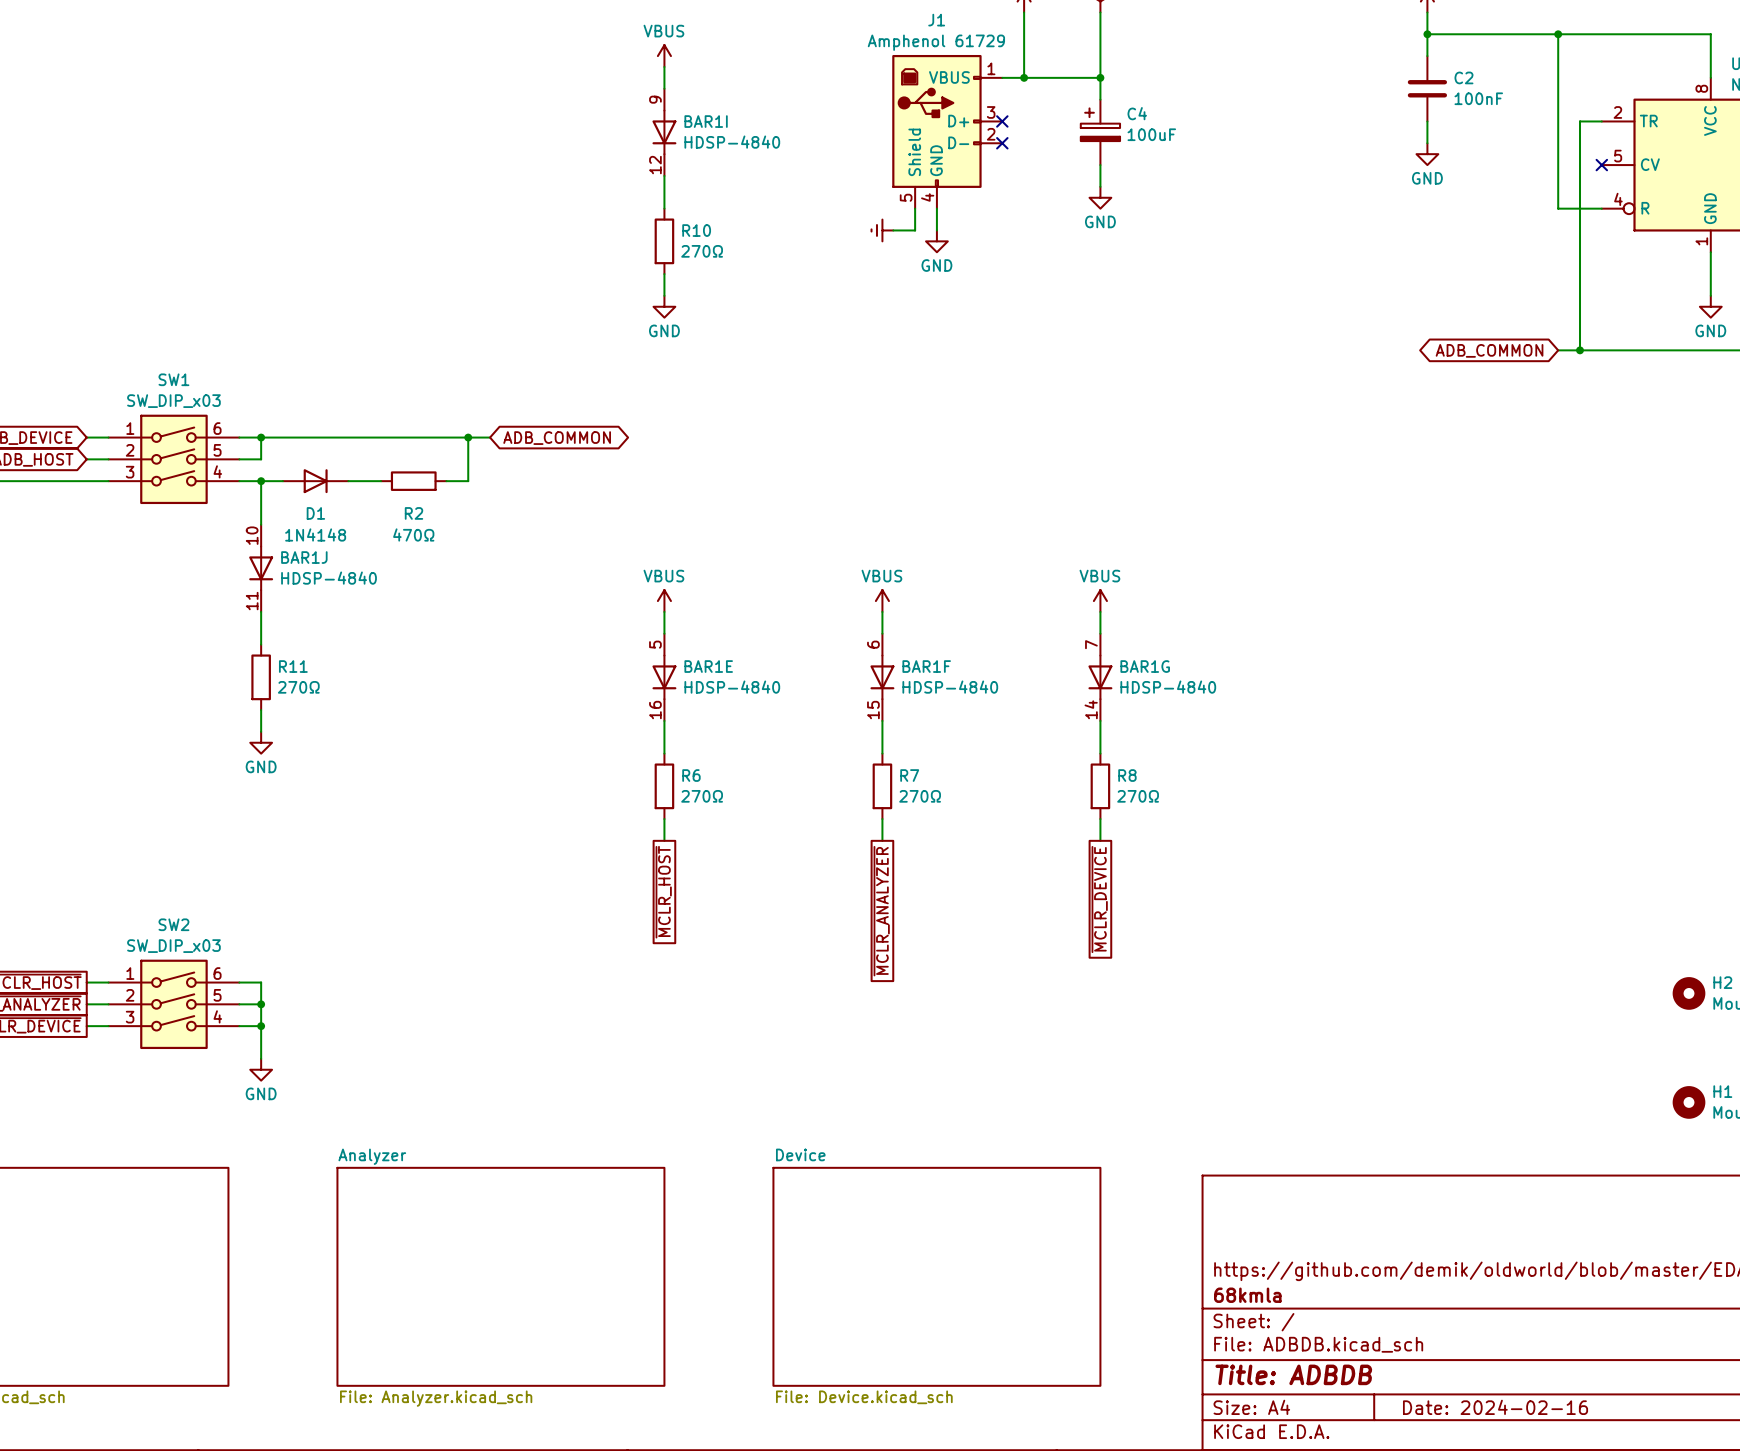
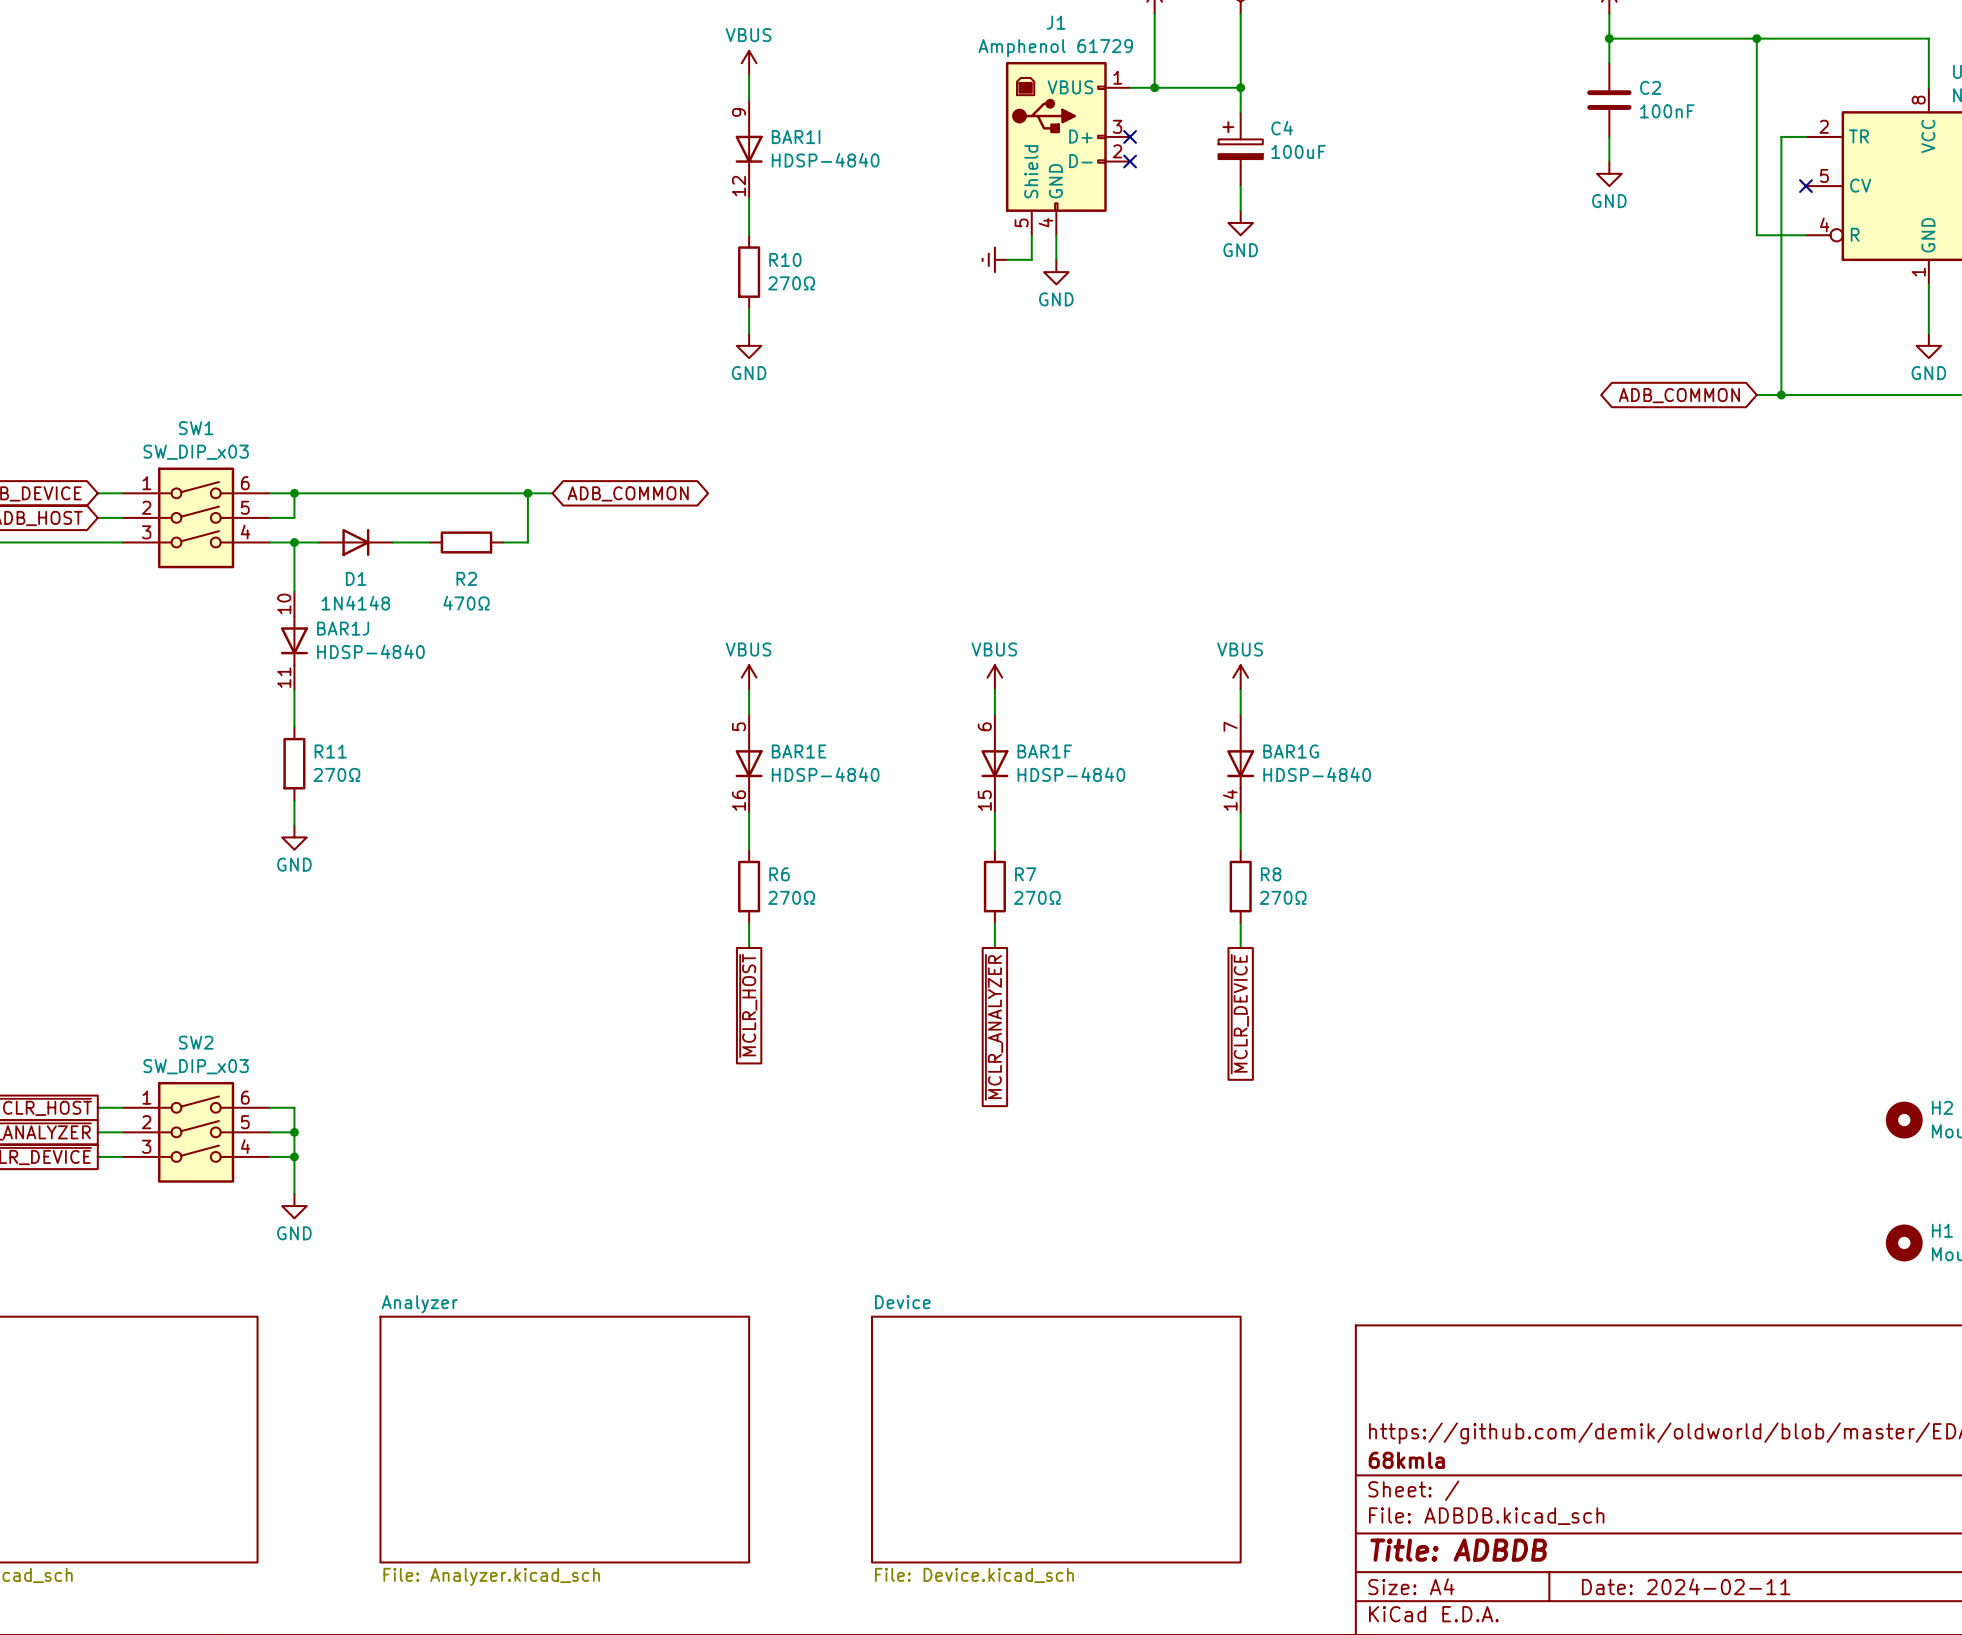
title block: Date: 2024-02-16 (1495, 1407) -> Date: 2024-02-11 (1686, 1586)

